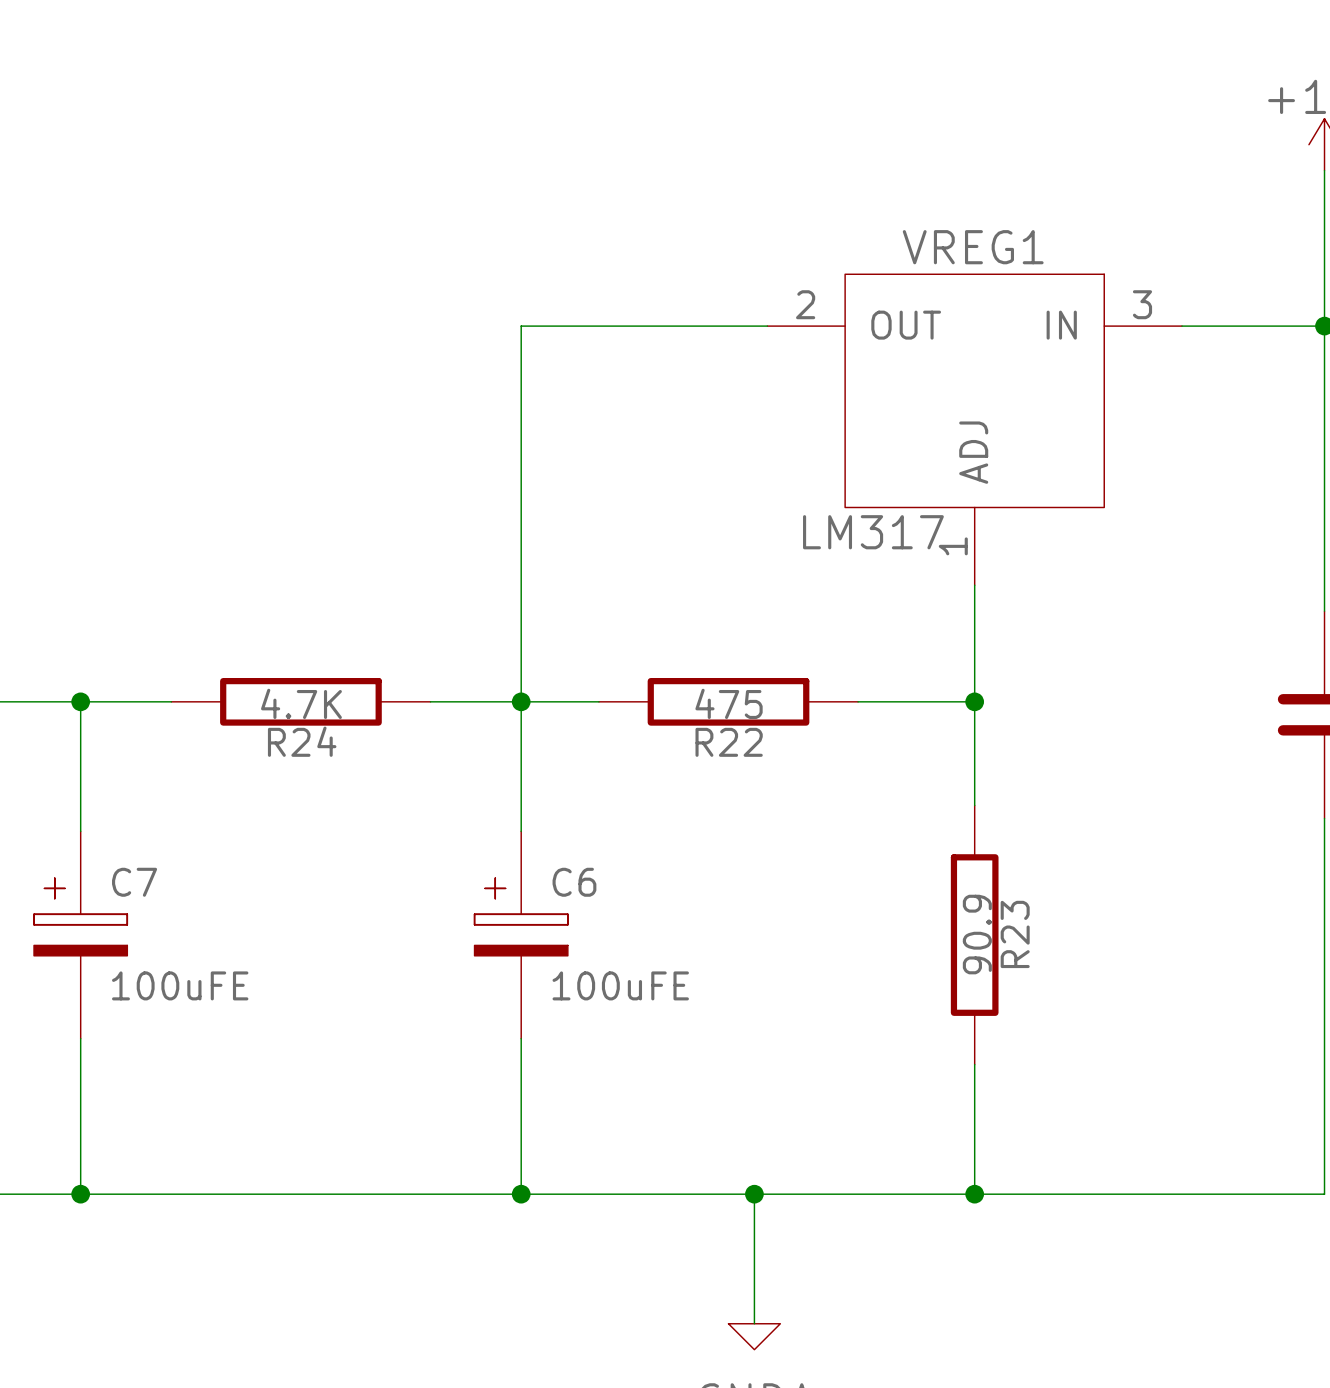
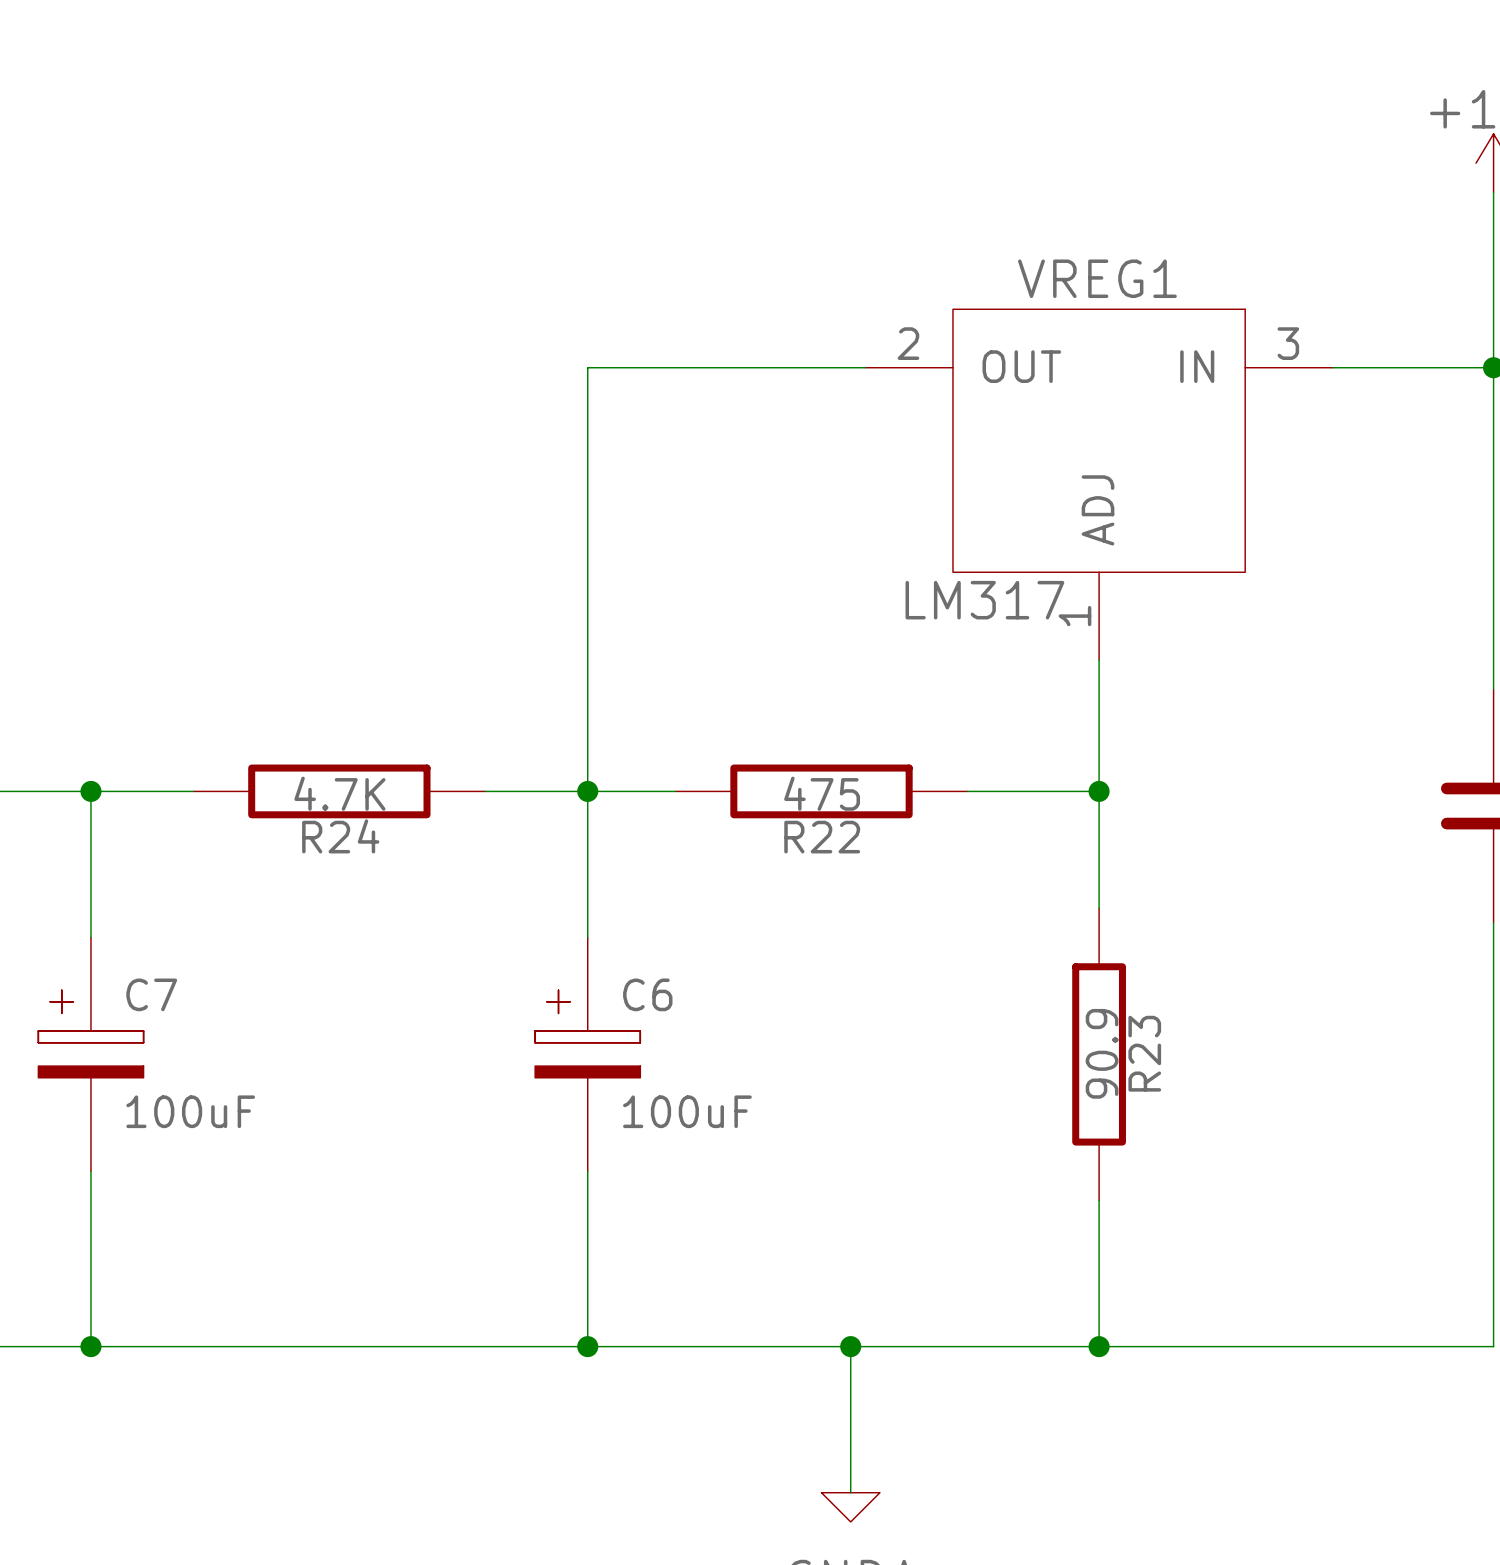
C7 value: 100uFE (180, 985) -> 100uF (190, 1111)
C6 value: 100uFE (620, 985) -> 100uF (687, 1111)

